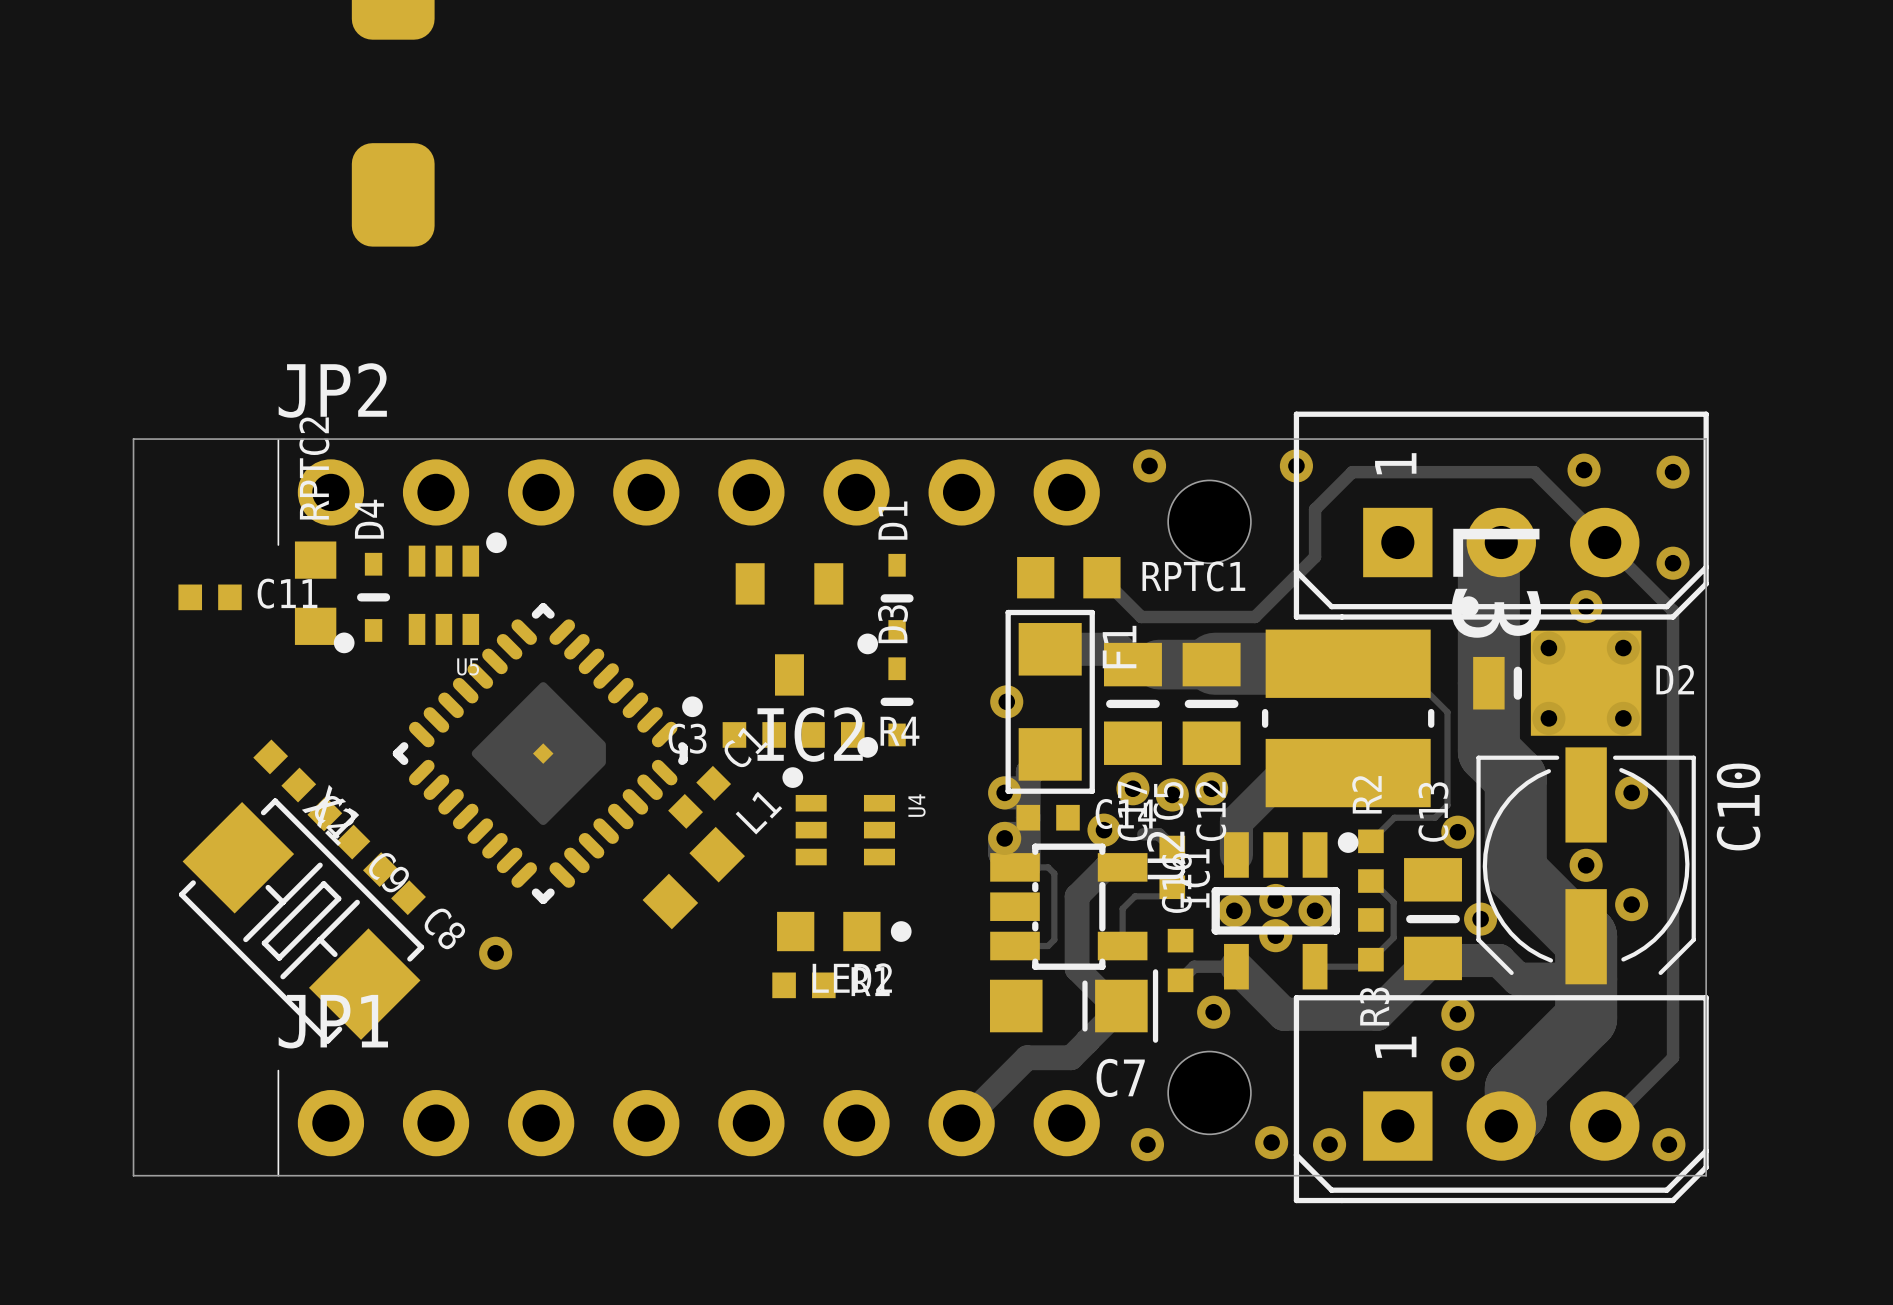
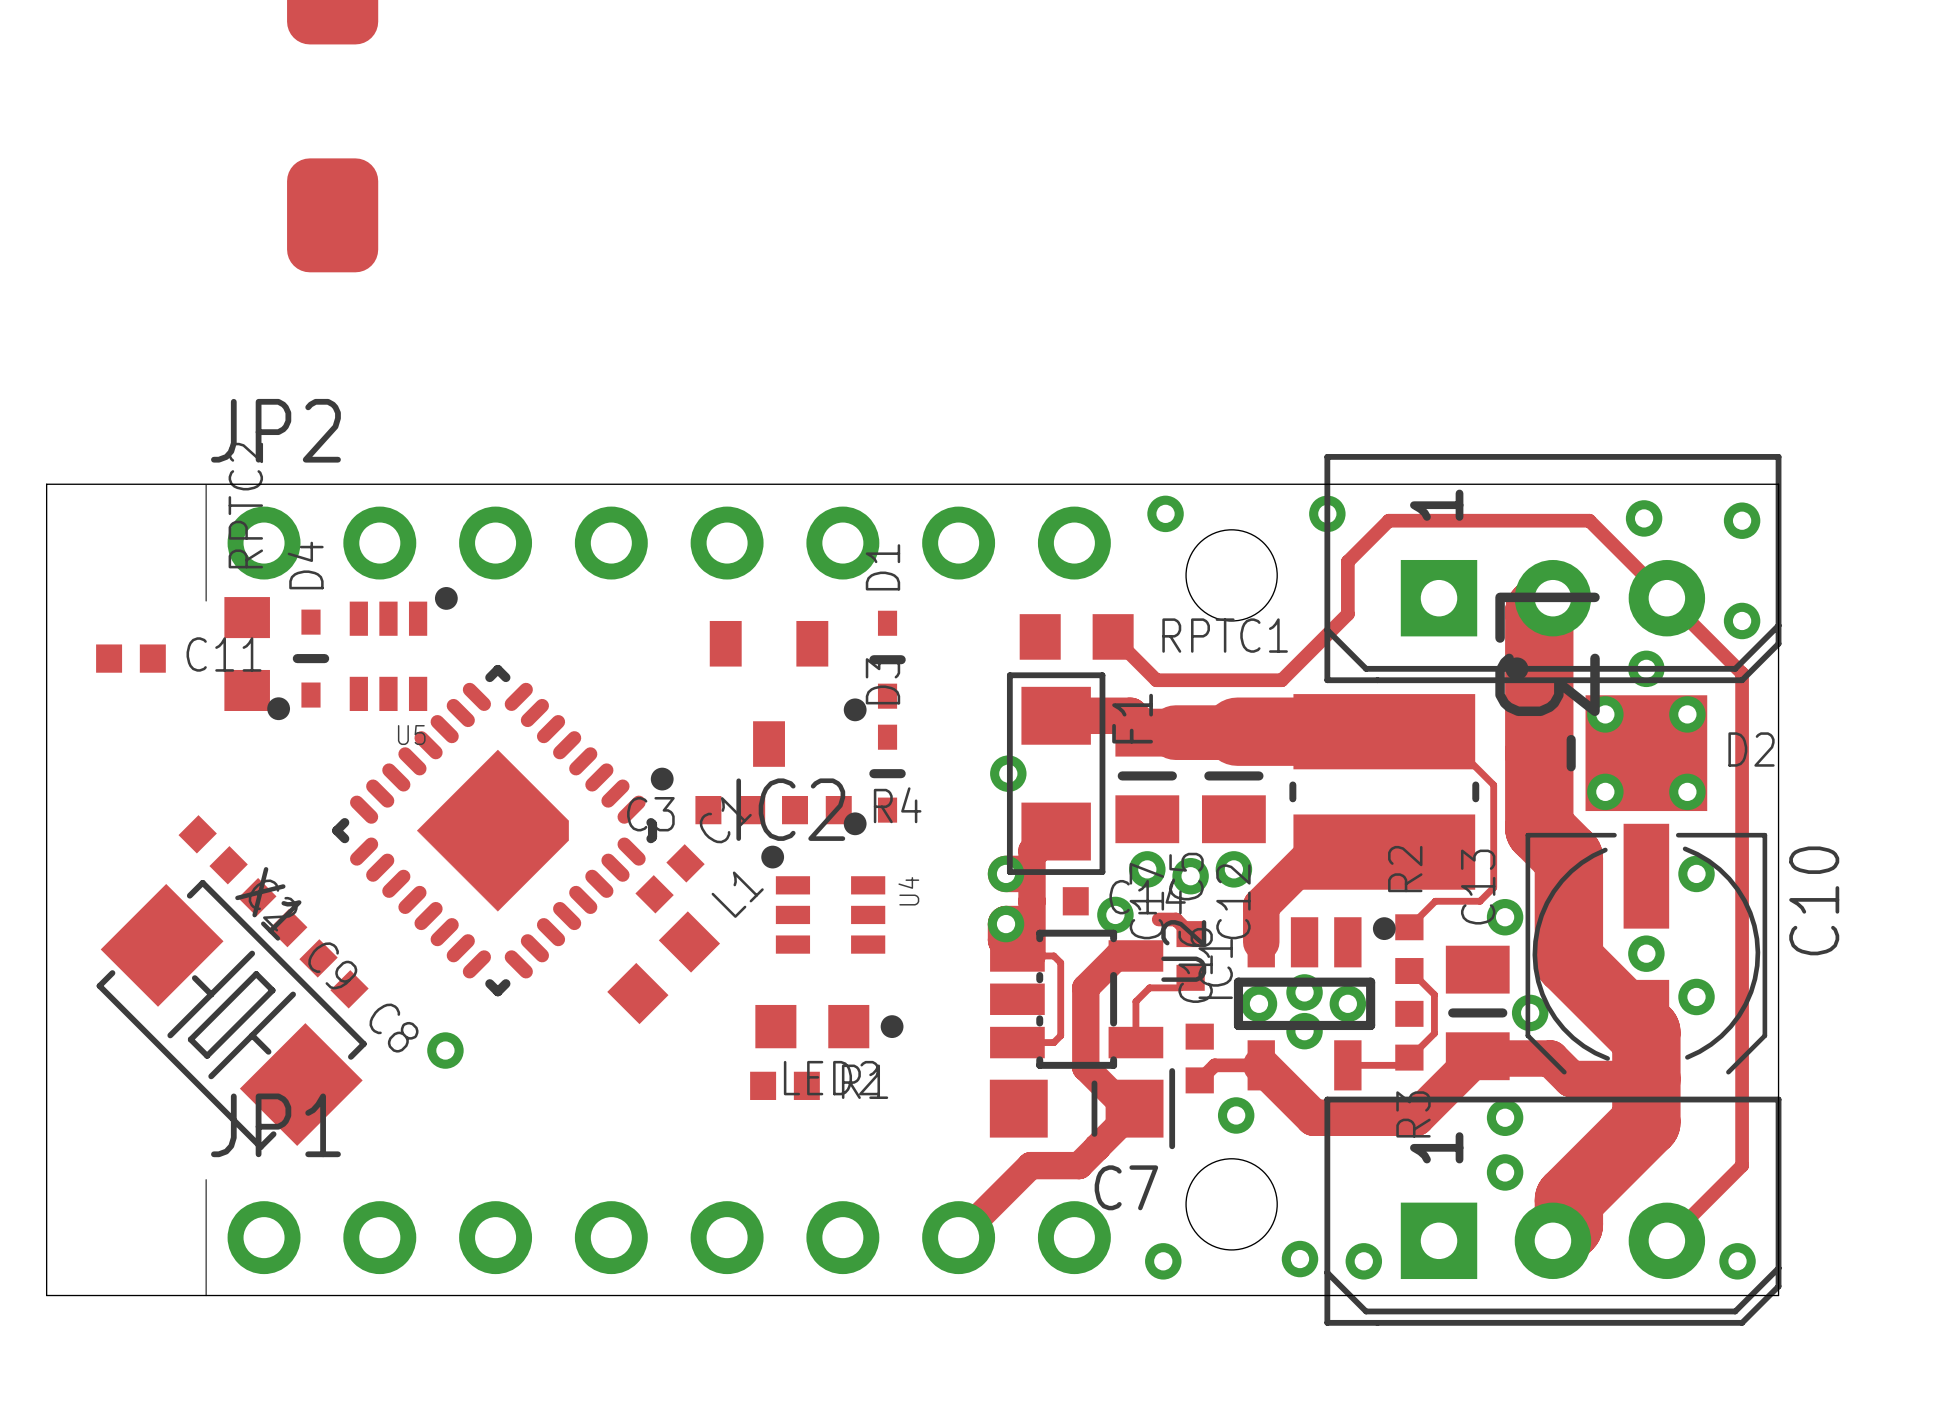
part footprint: [392, 603, 703, 905] -> [332, 664, 674, 997]

